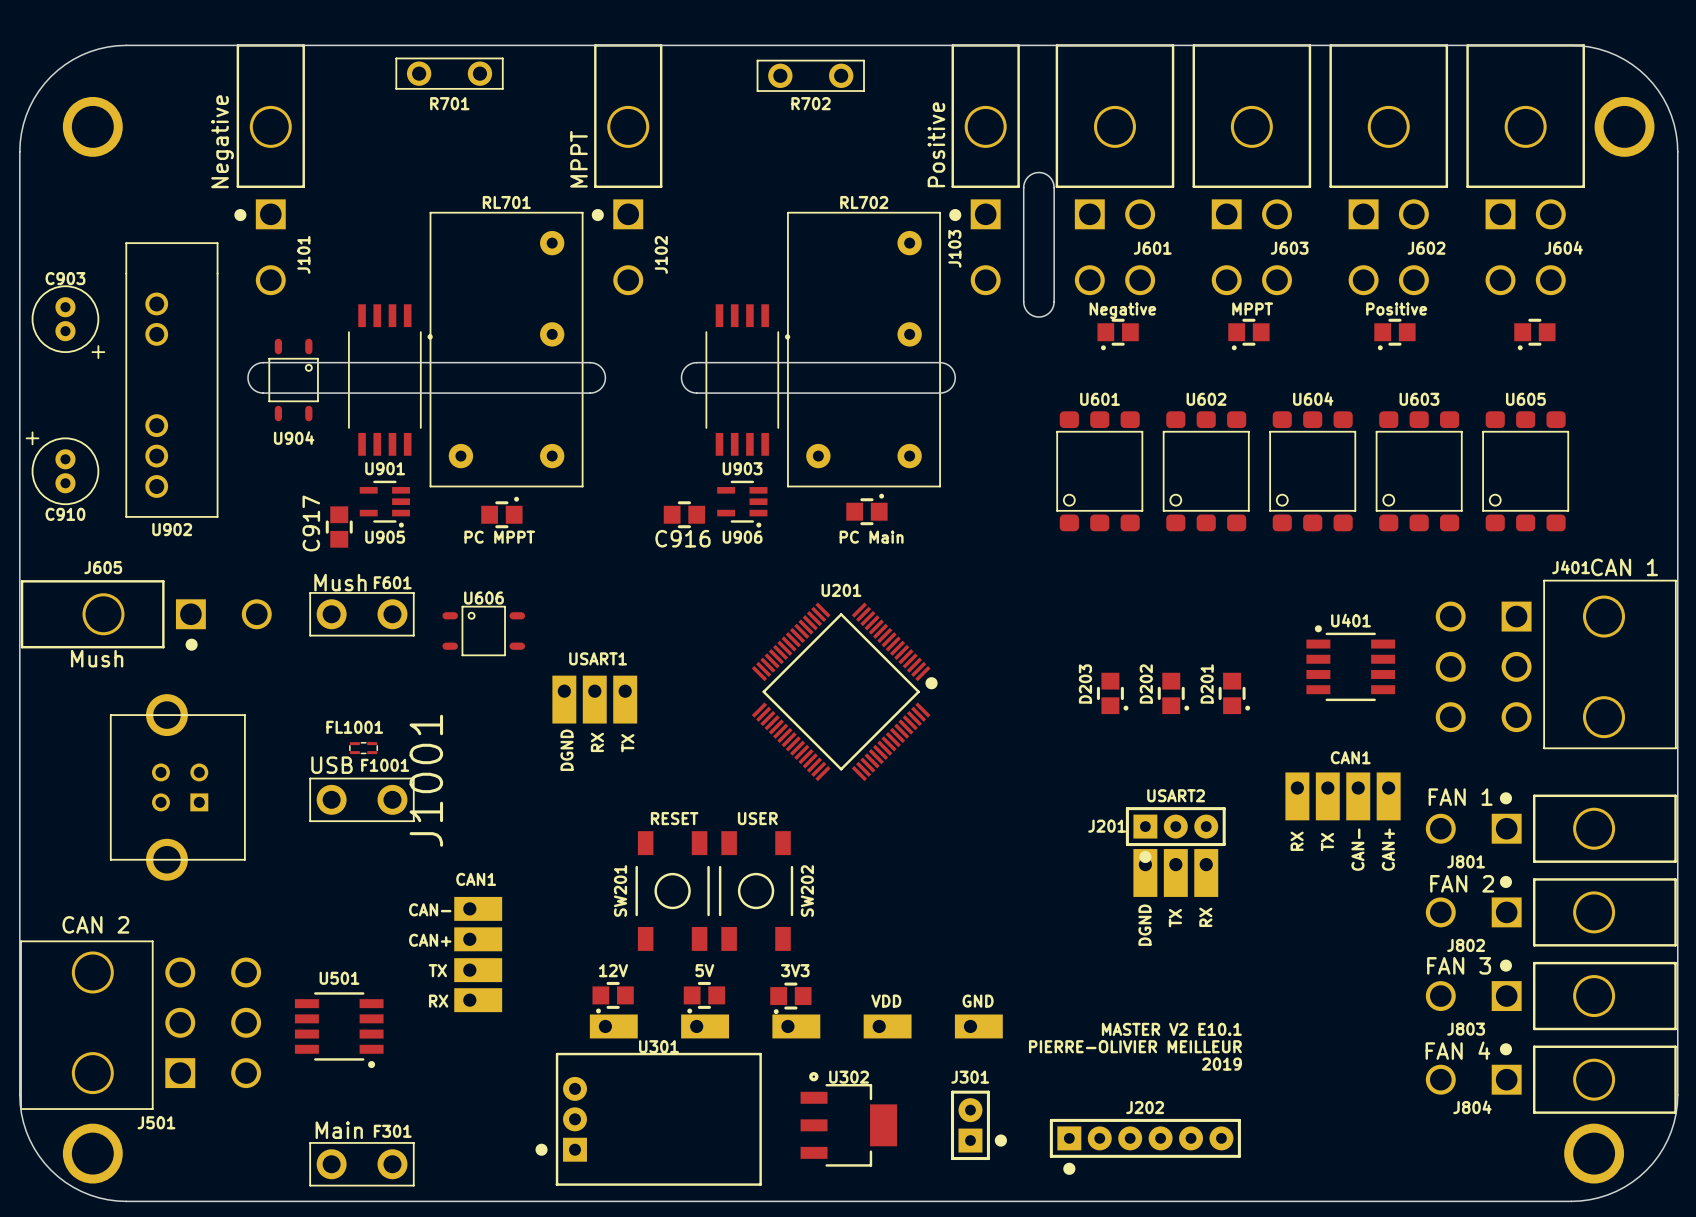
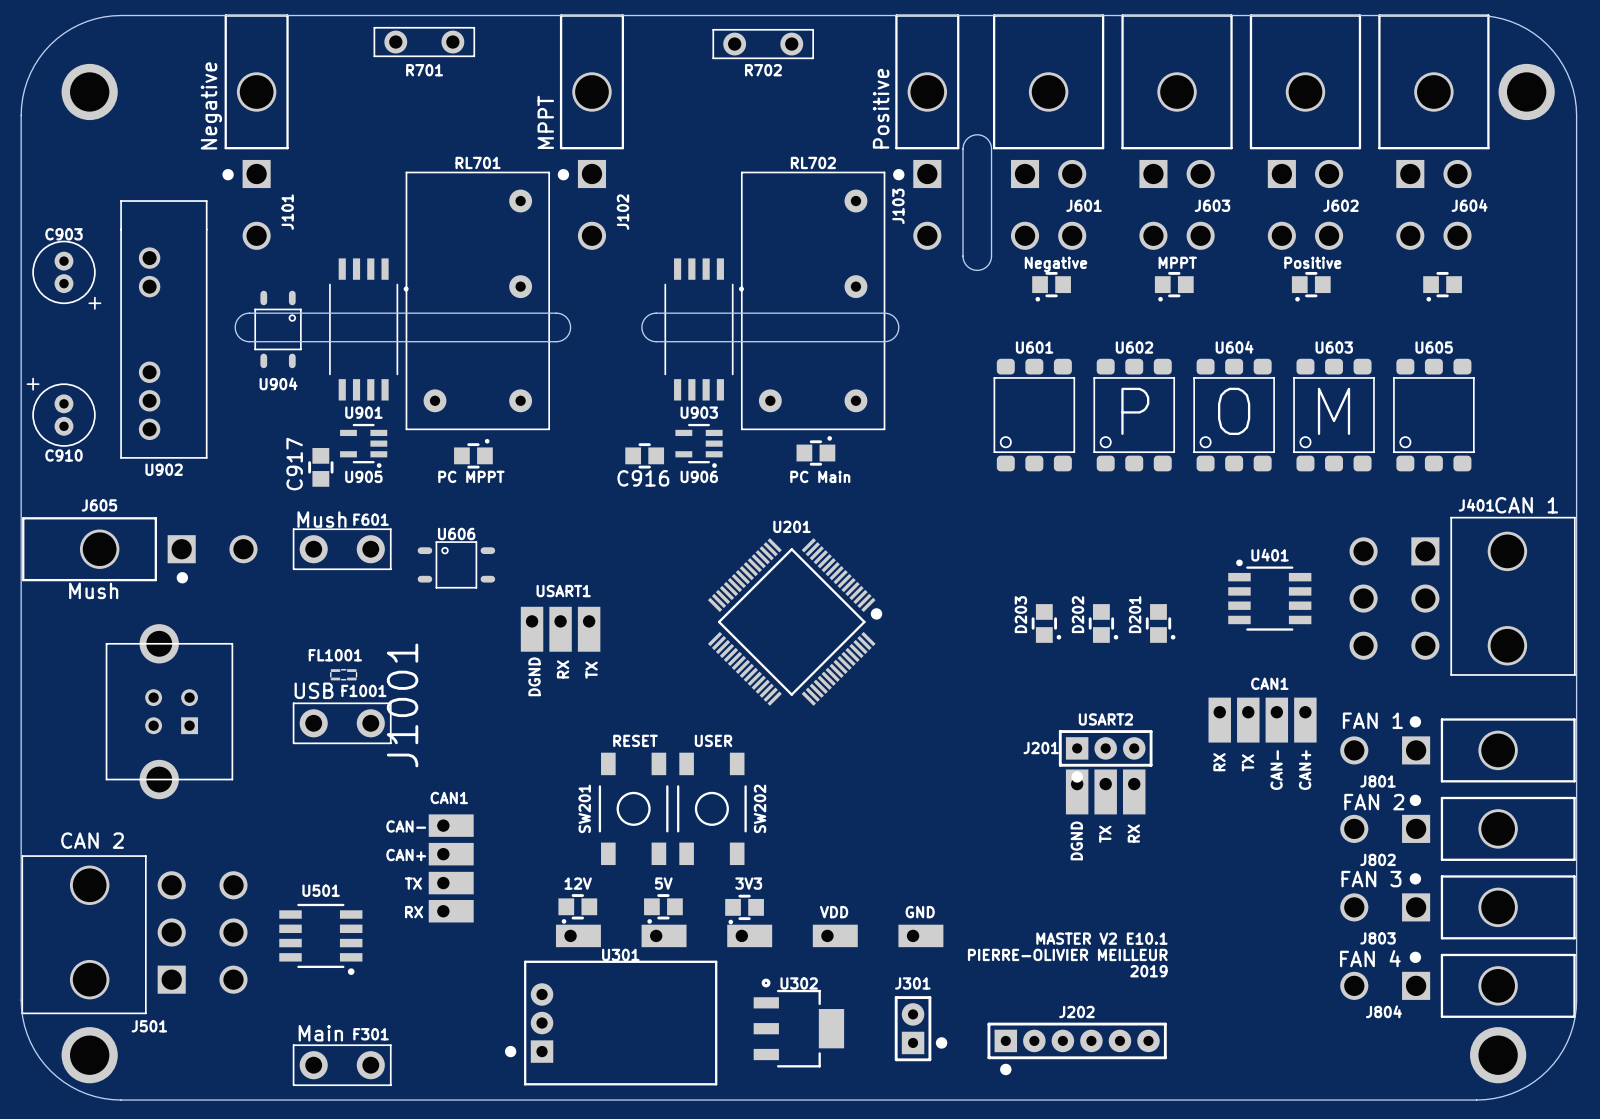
text: none -> P (1135, 411)
text: none -> O (1234, 411)
text: none -> M (1334, 411)

